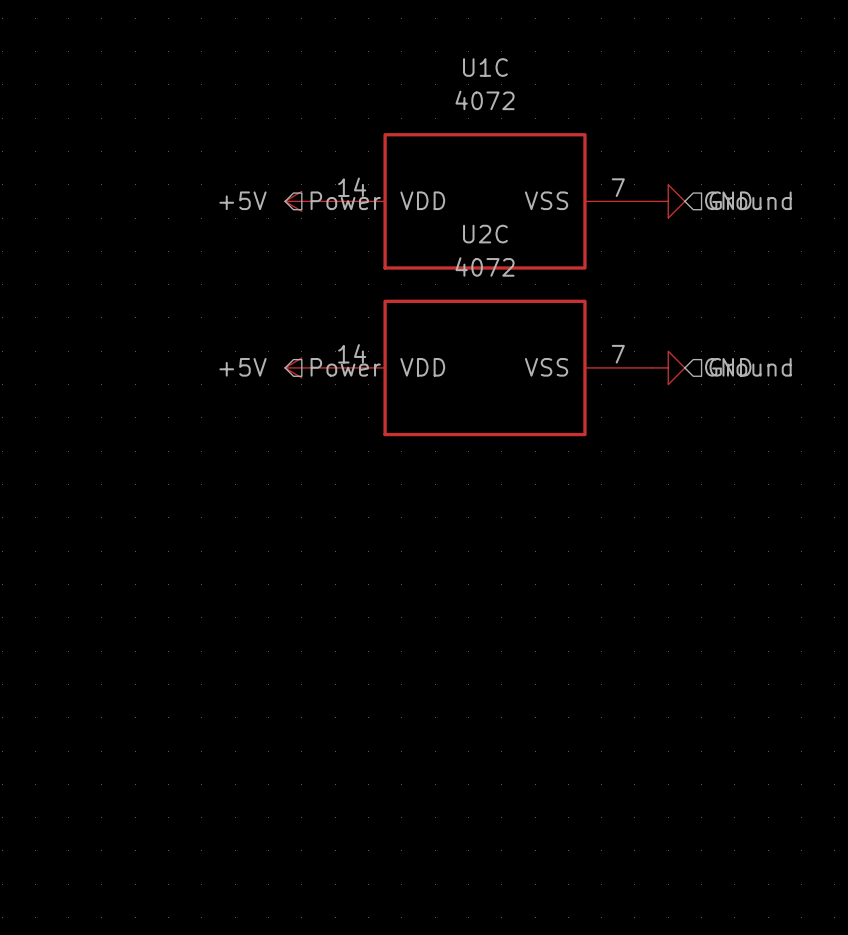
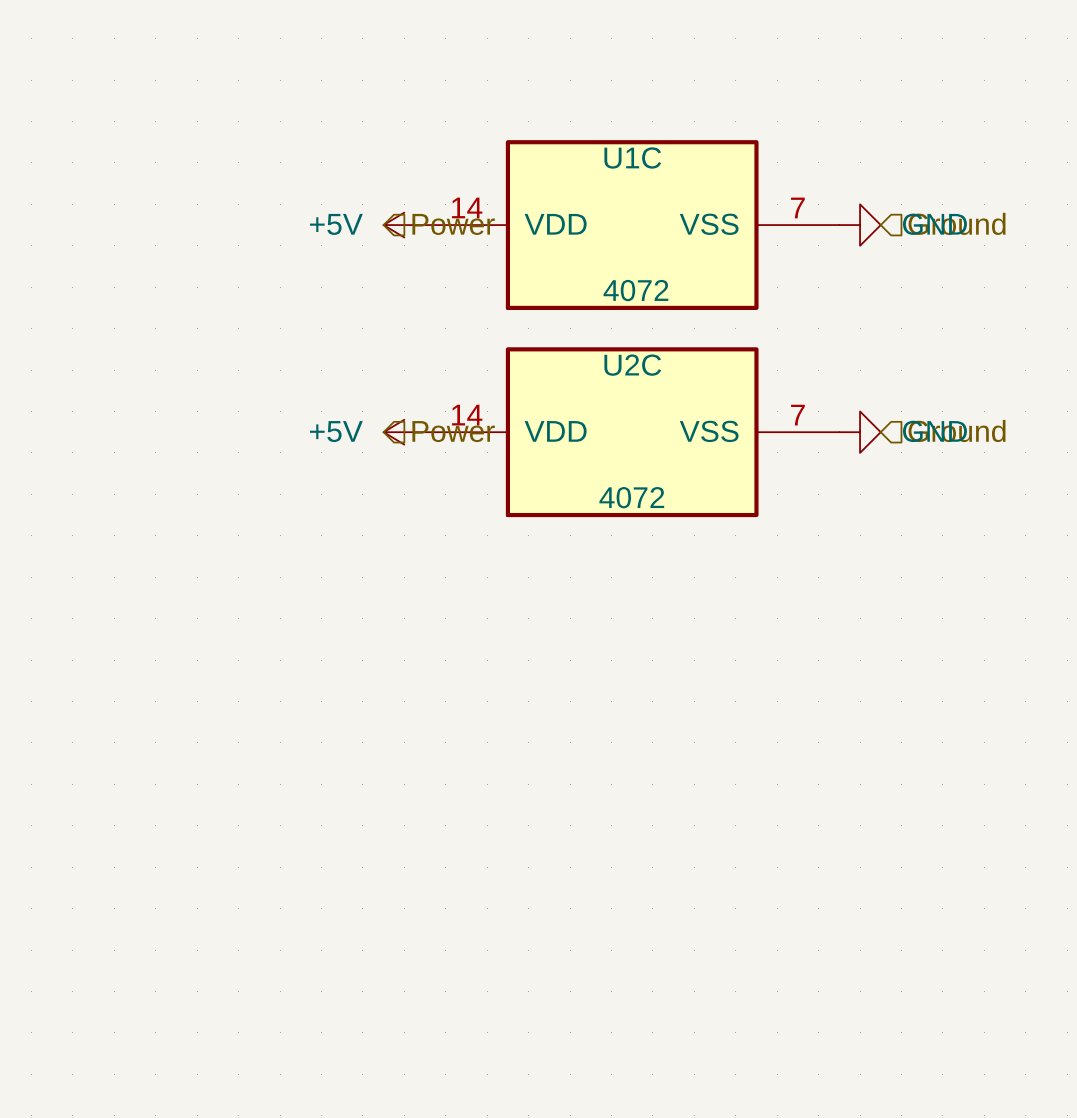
U1C name position: U1C (485, 67) -> U1C (632, 157)
U1C value position: 4072 (485, 100) -> 4072 (635, 290)
U2C name position: U2C (485, 234) -> U2C (632, 365)
U2C value position: 4072 (485, 266) -> 4072 (631, 497)

